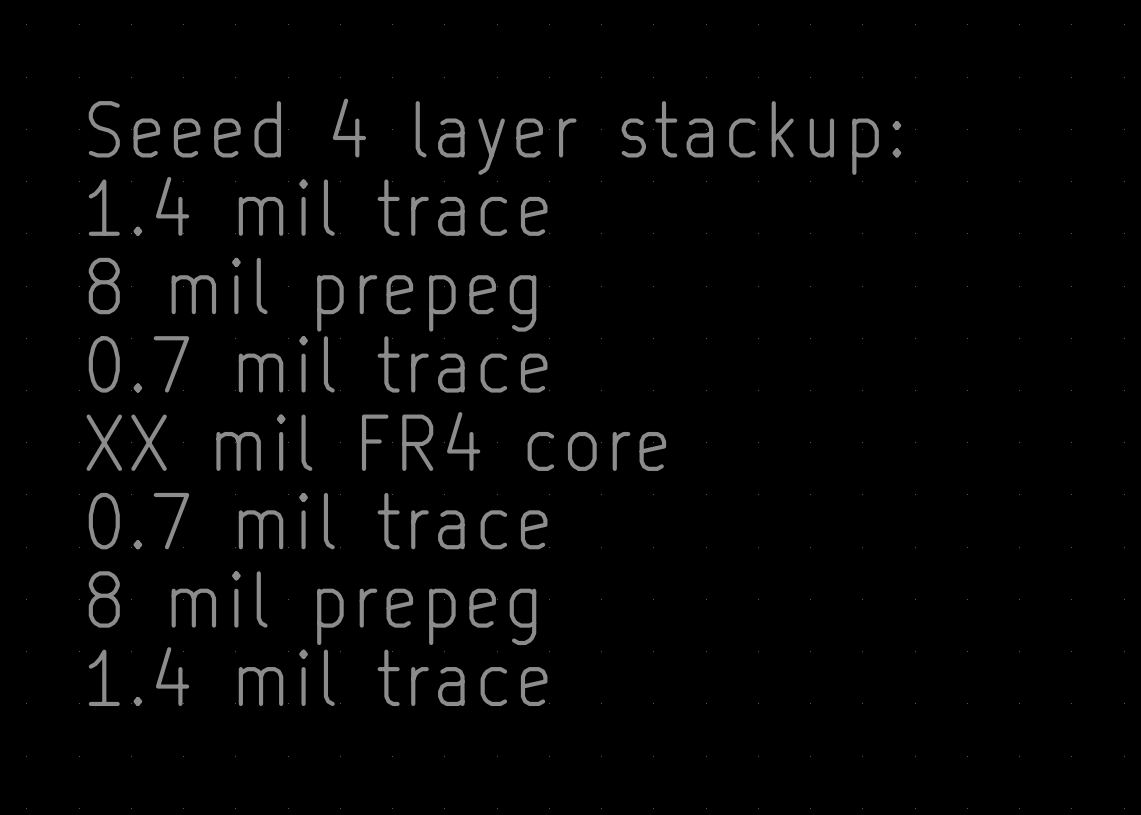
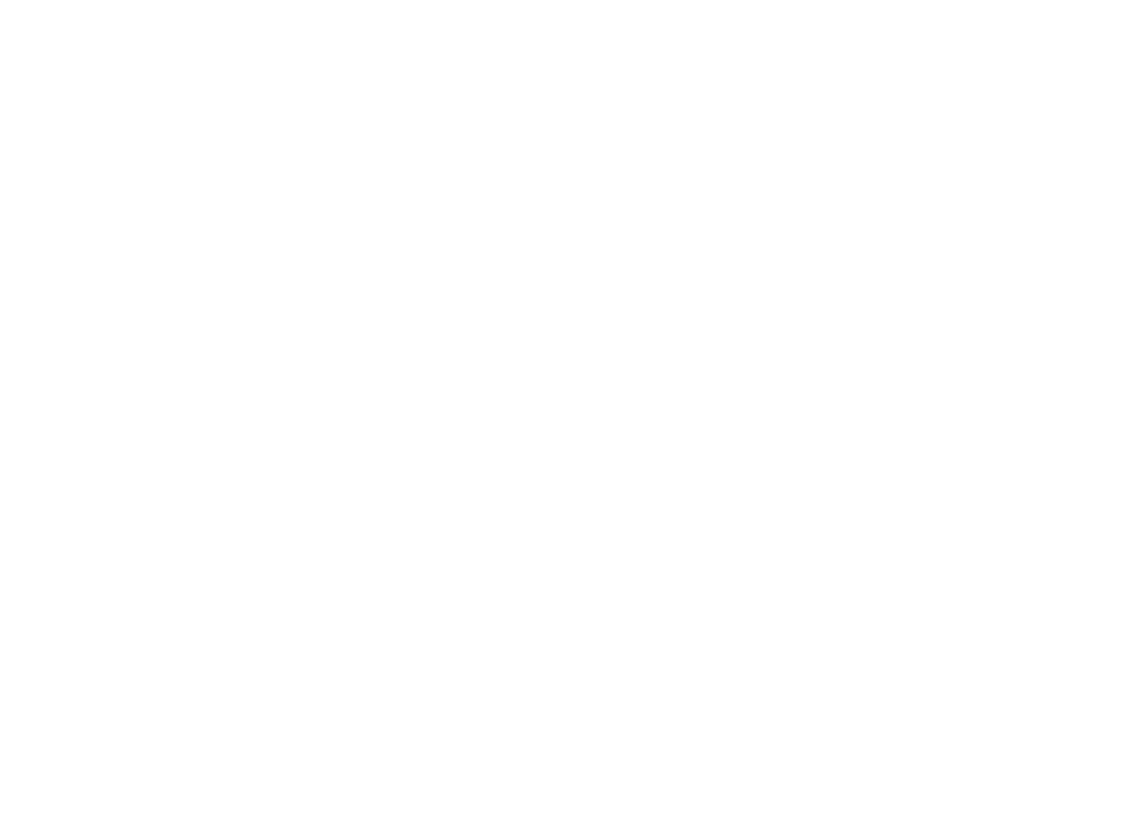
text: Seeed 4 layer stackup: (494, 136) -> none
text: 1.4 mil trace (318, 206) -> none
text: 8 mil prepeg (312, 294) -> none
text: 0.7 mil trace (318, 364) -> none
text: XX mil FR4 core (376, 441) -> none
text: 0.7 mil trace (318, 521) -> none
text: 8 mil prepeg (312, 608) -> none
text: 1.4 mil trace (318, 676) -> none

